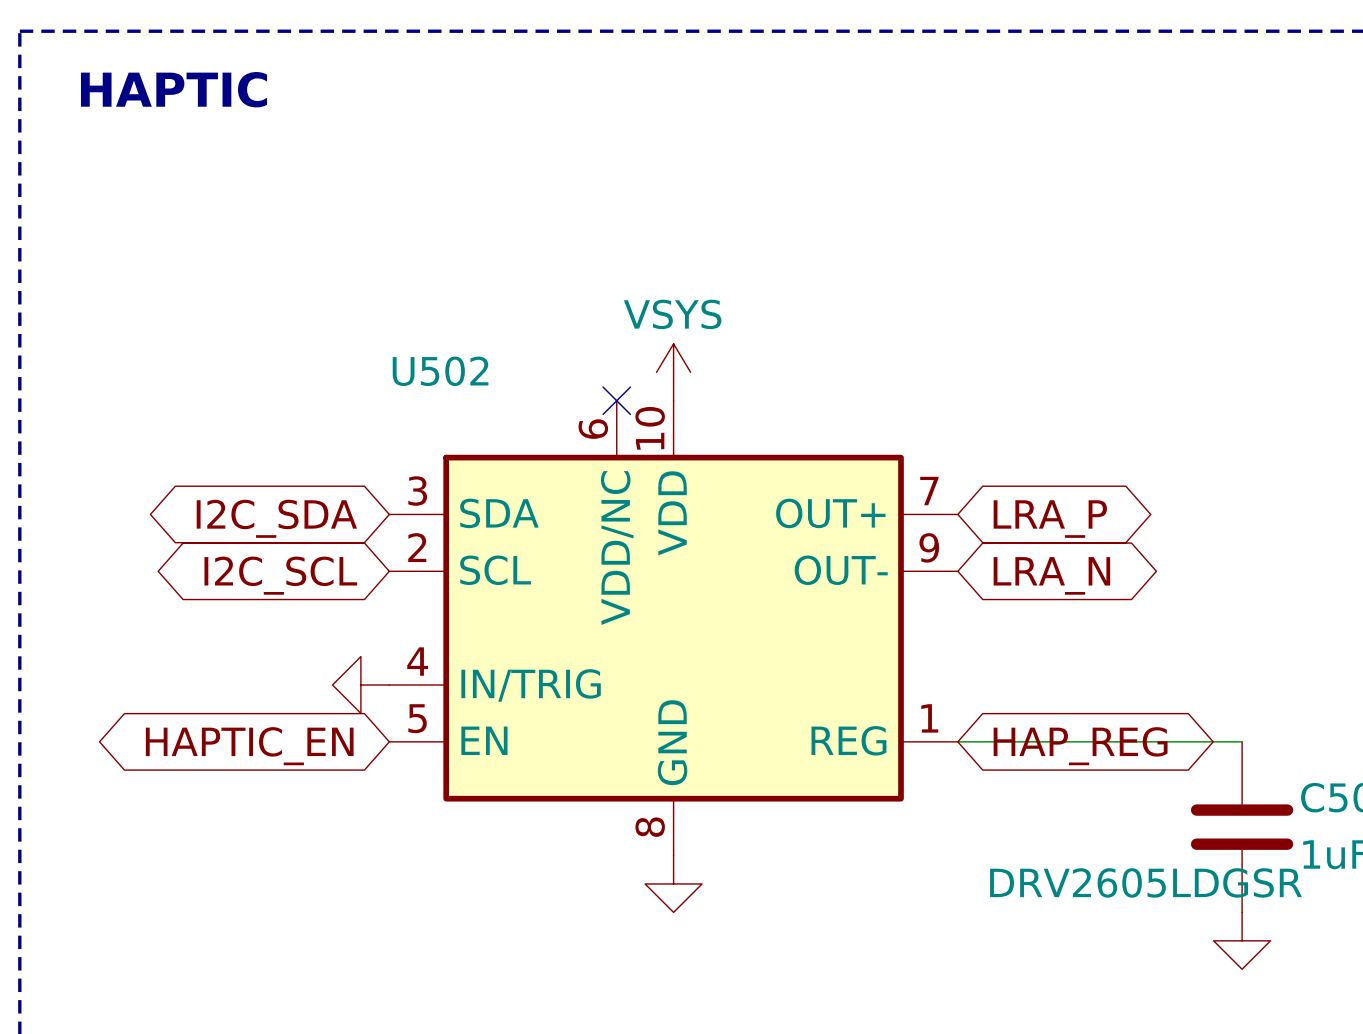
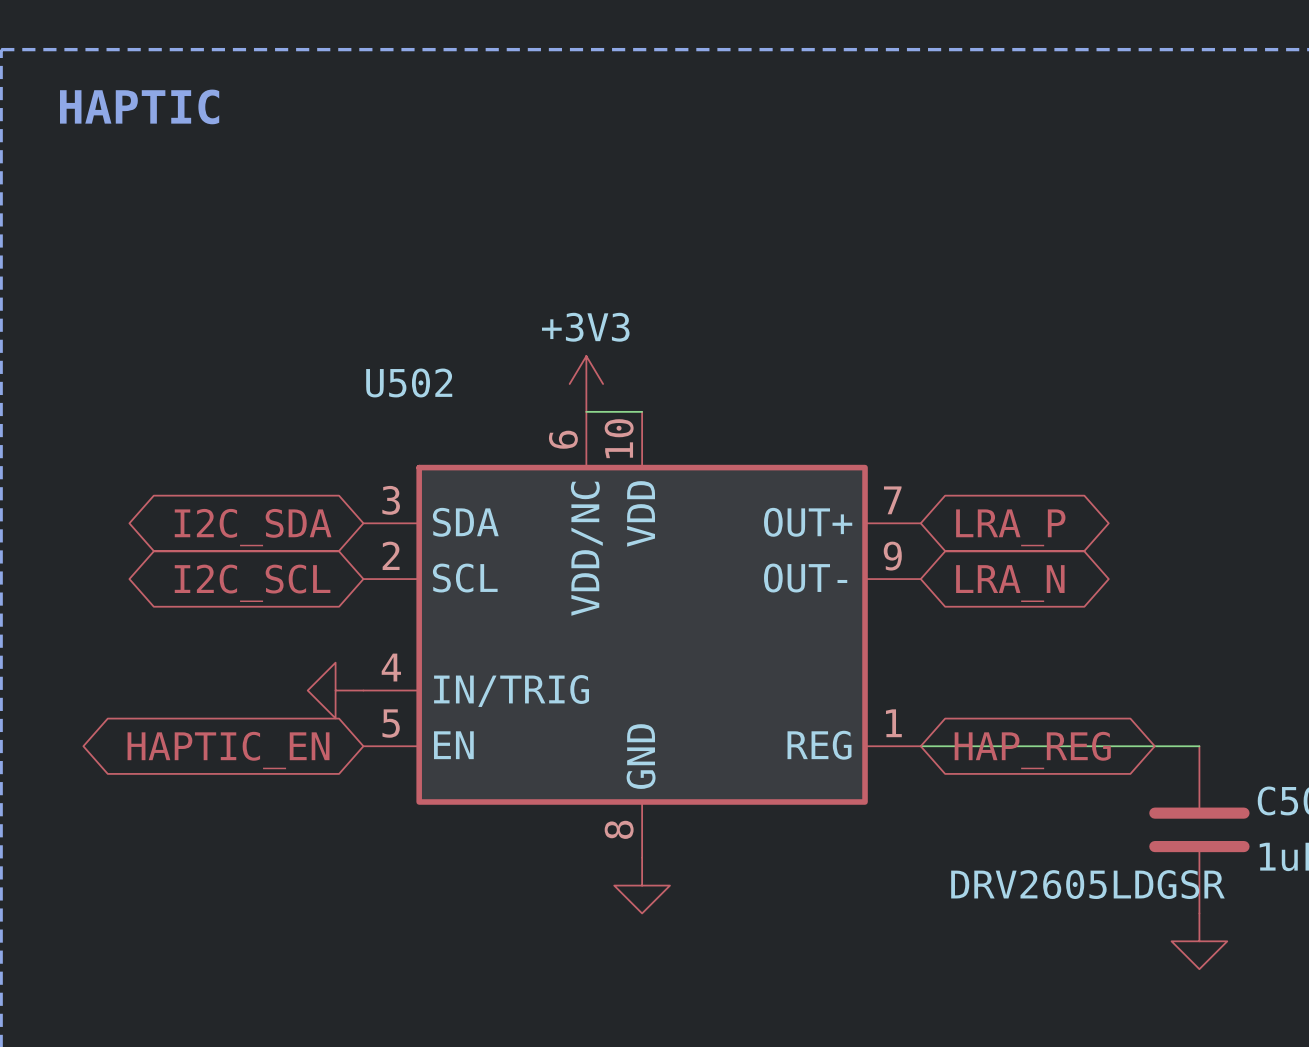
power symbol: none -> +3V3 (586, 384)
power symbol: VSYS (673, 372) -> none
wire: none -> (586, 411) (642, 411)
no-connect mark: (616, 400) -> none

